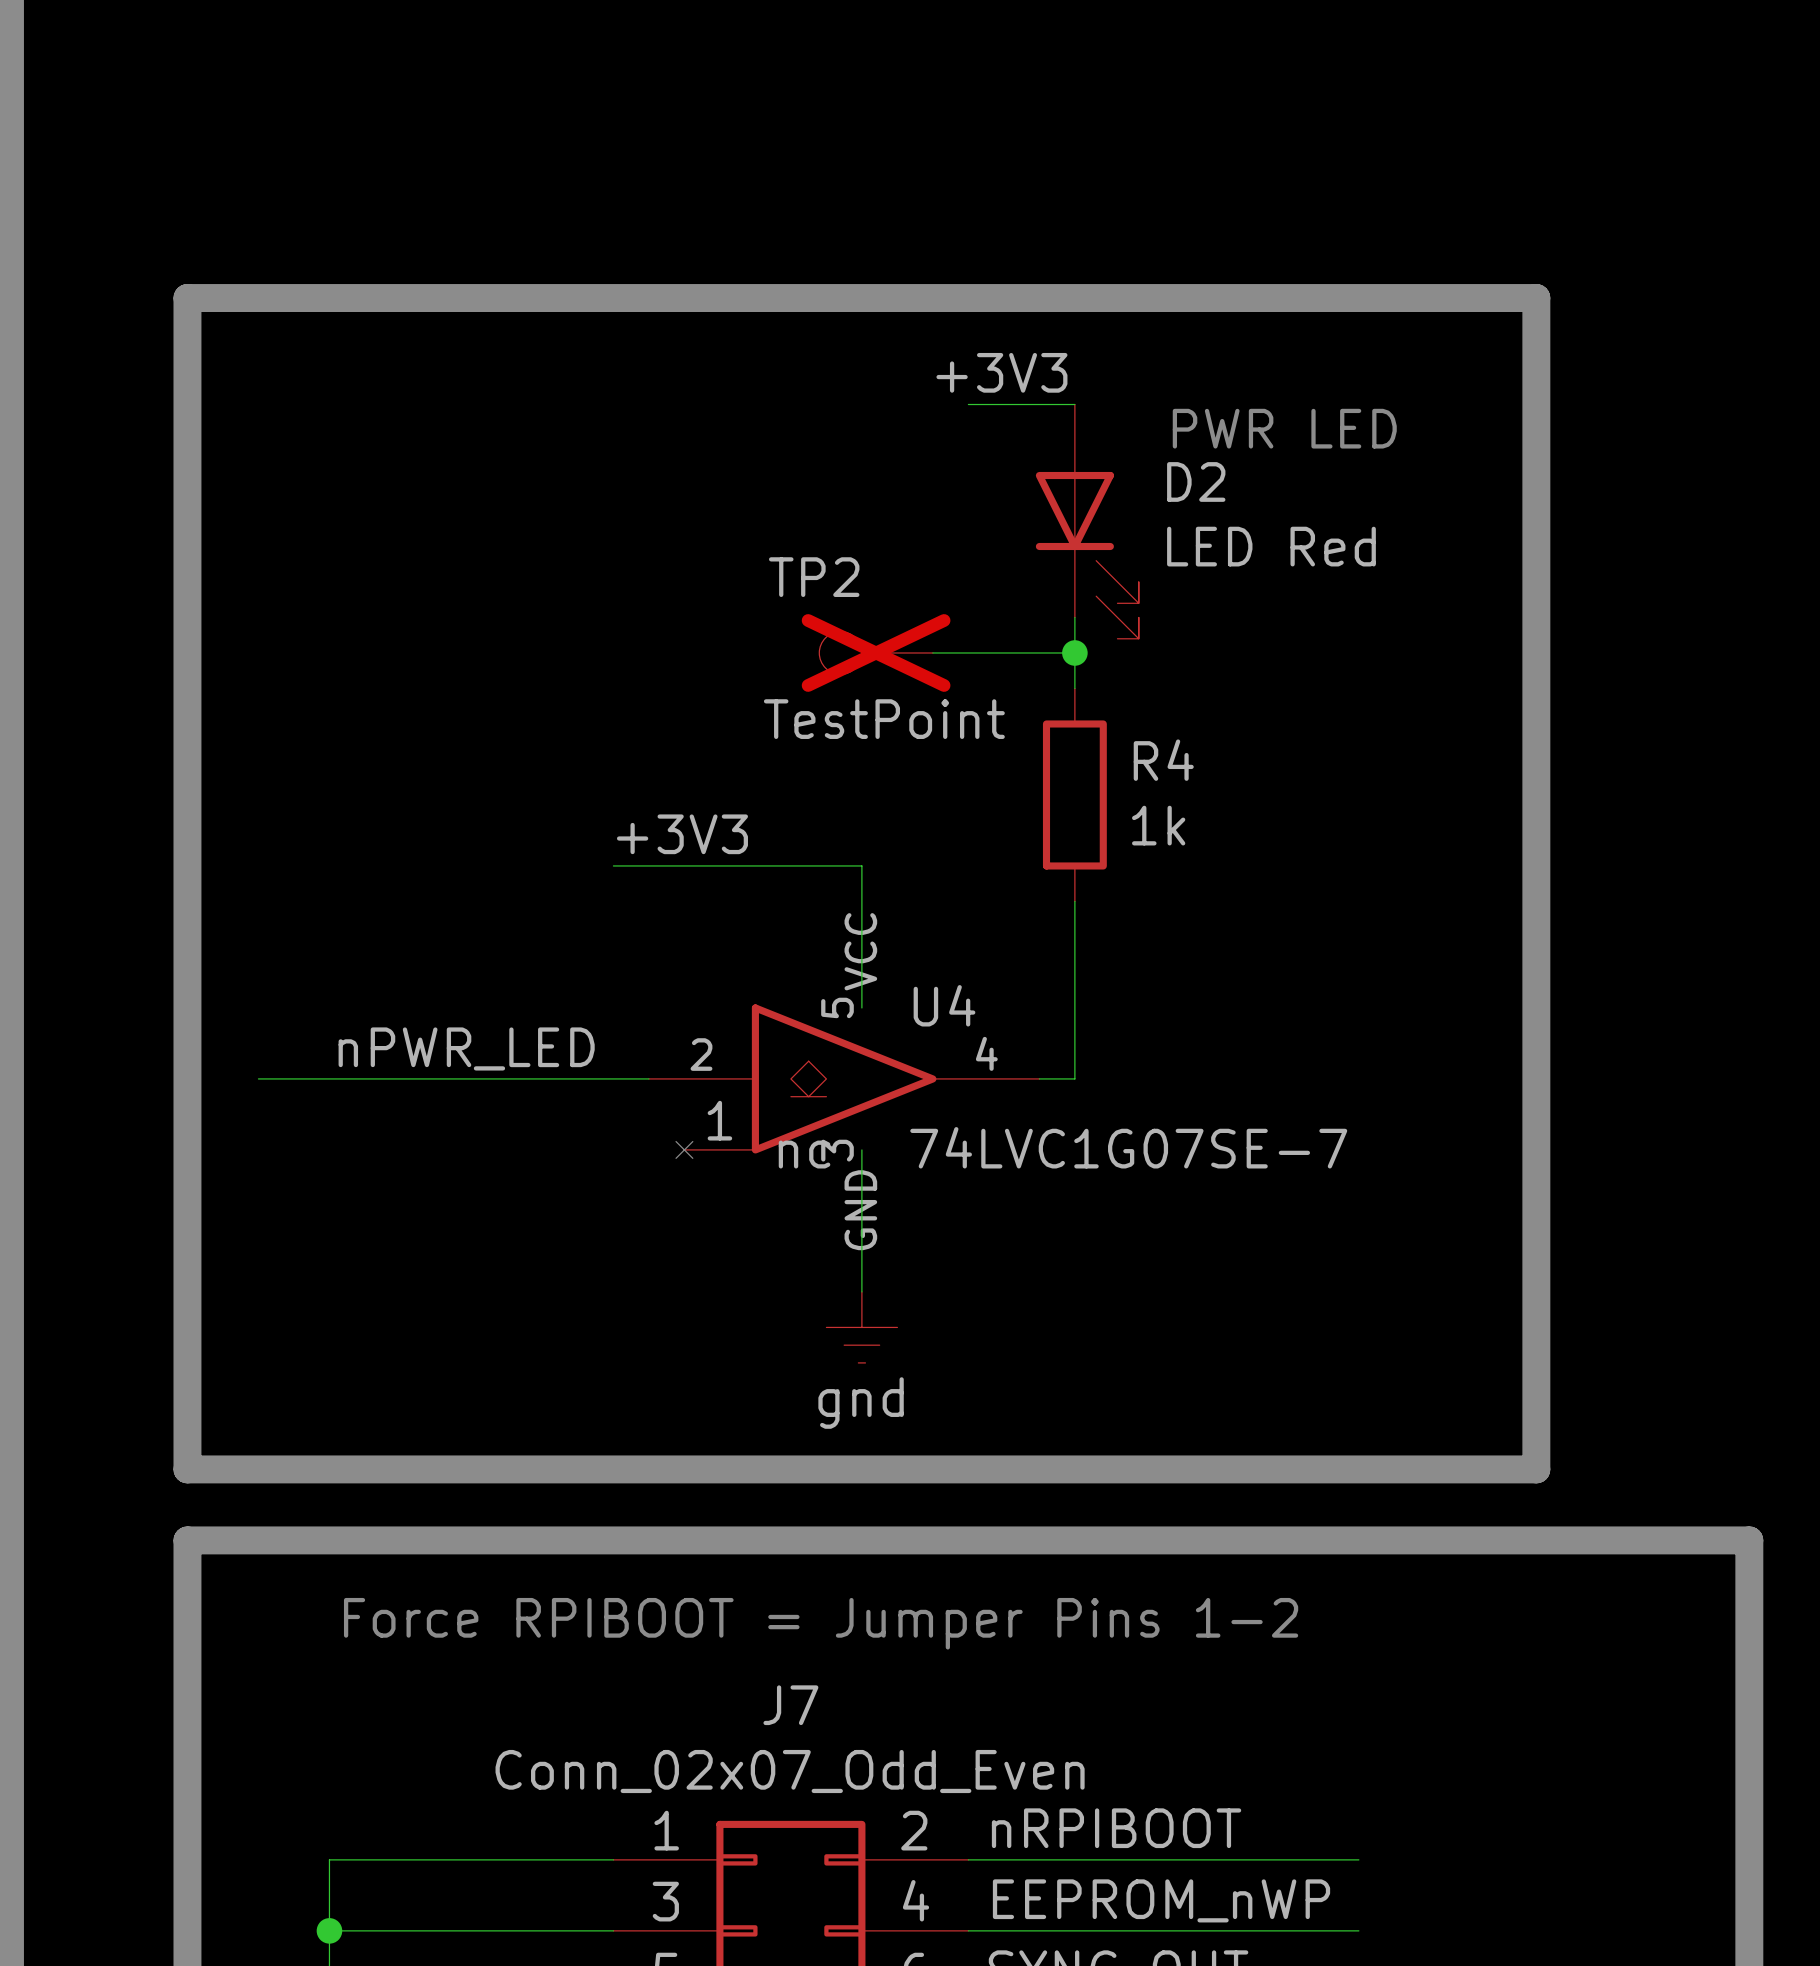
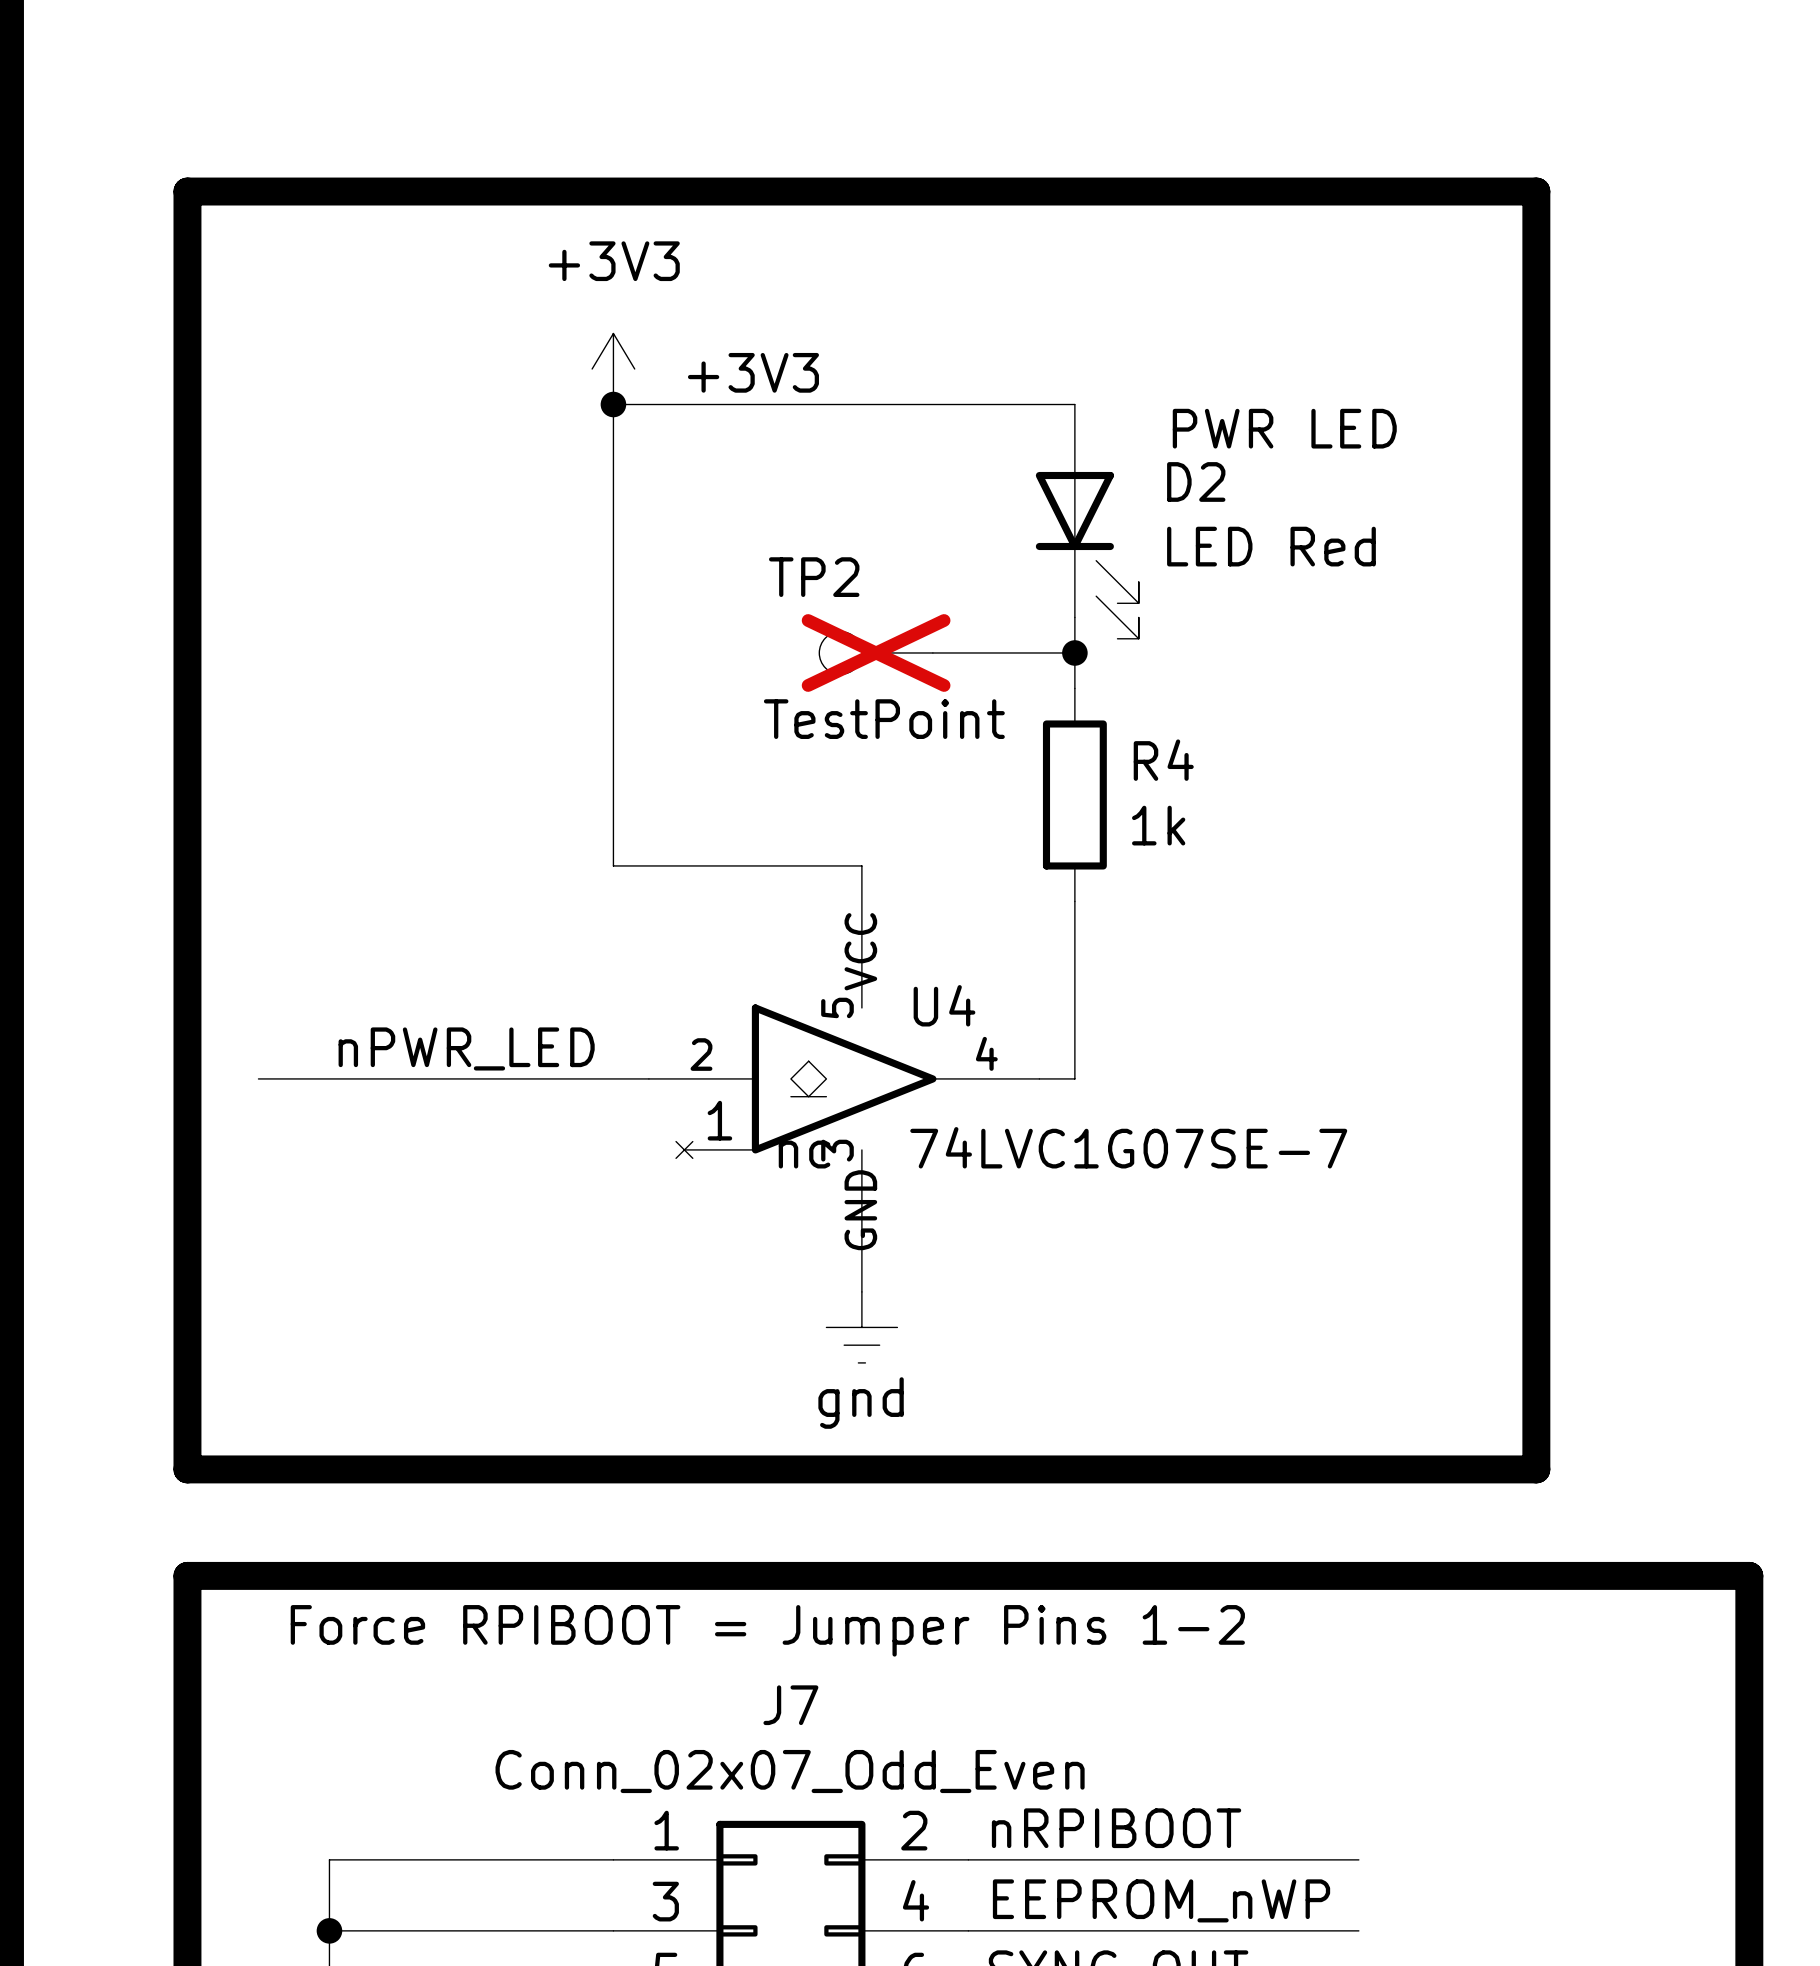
line: (187, 298) (1536, 298) -> (187, 298) (187, 191) (1536, 191) (1536, 298)
power symbol: none -> +3V3 (613, 369)
label: none -> +3V3 (753, 372)
label: +3V3 (1001, 372) -> none
junction: none -> (613, 404)
wire: none -> (968, 404) (613, 404) (613, 865)
label: +3V3 (682, 834) -> none
line: (187, 1575) (187, 1540) (1749, 1540) (1749, 1575) -> (187, 1575) (1749, 1575)
text position: Force RPIBOOT = Jumper Pins 1-2 (821, 1623) -> Force RPIBOOT = Jumper Pins 1-2 (767, 1630)

